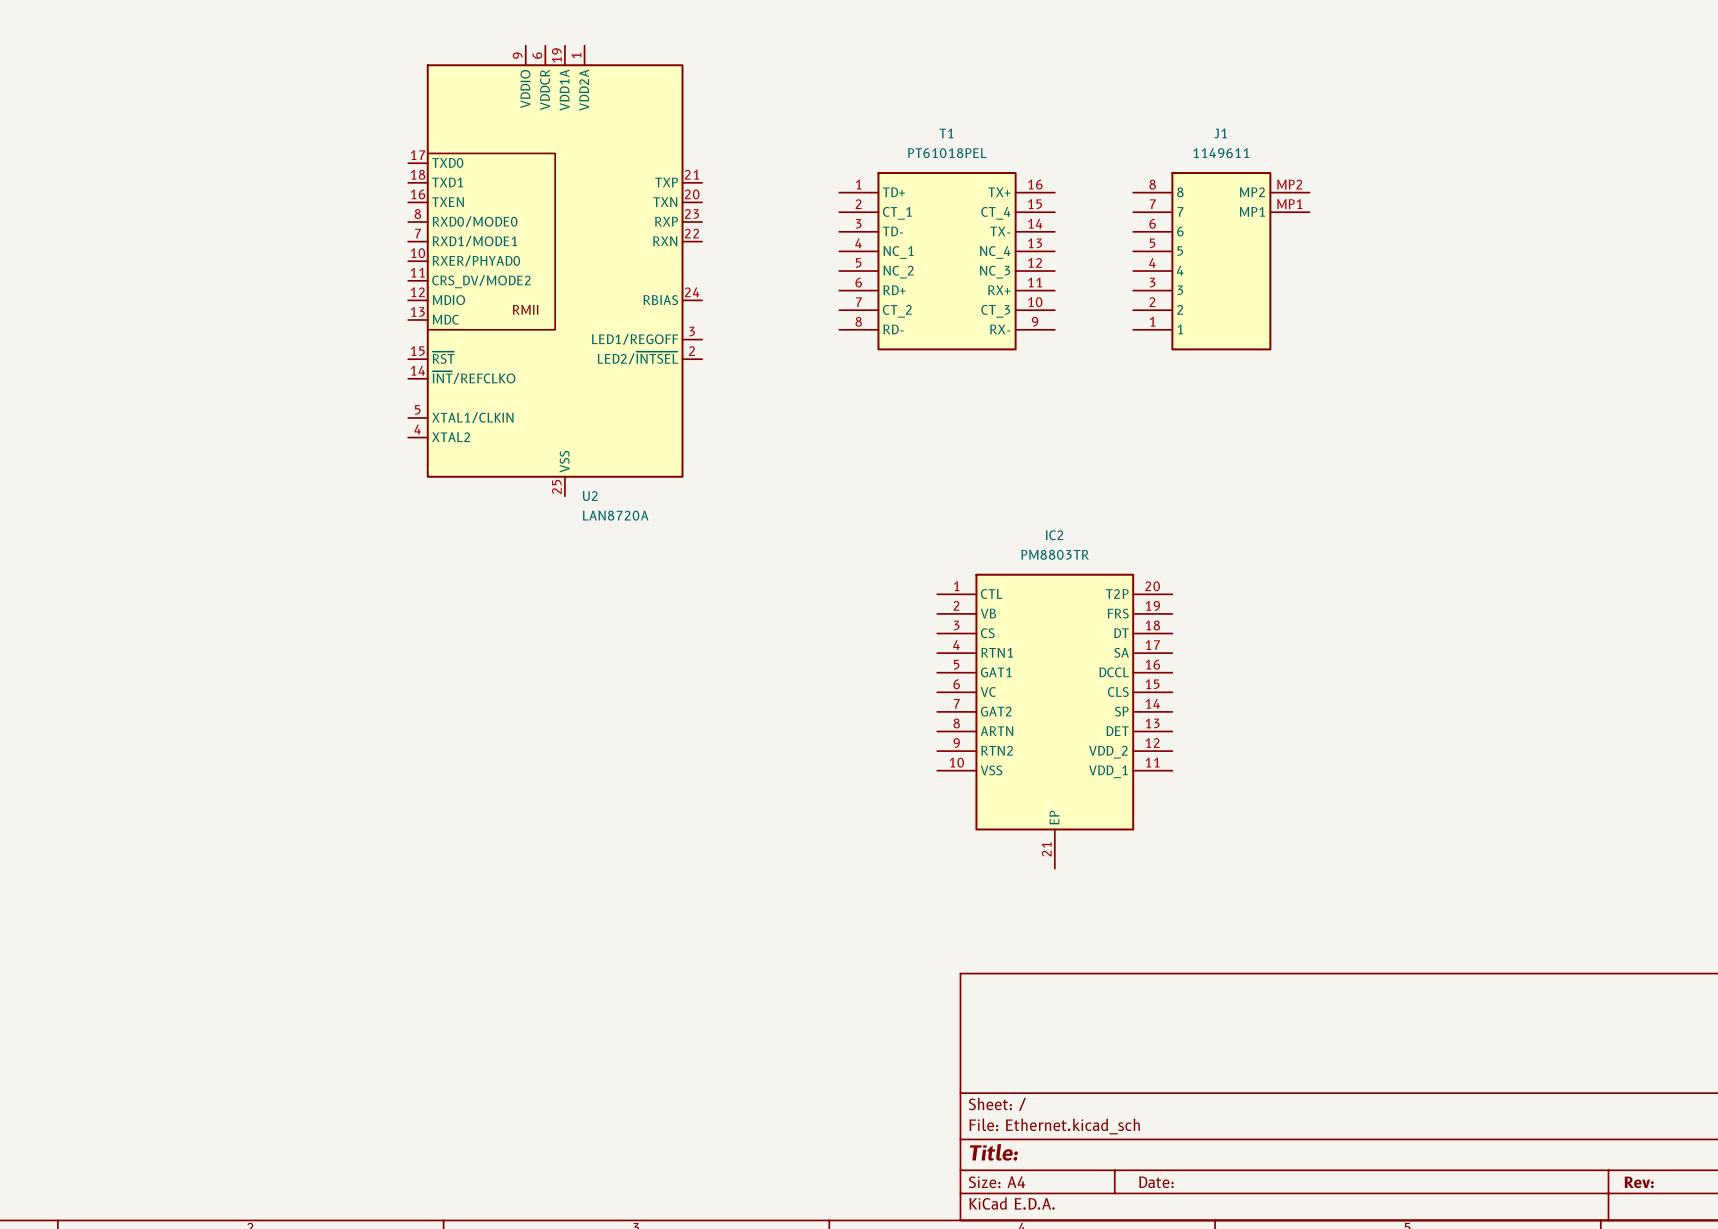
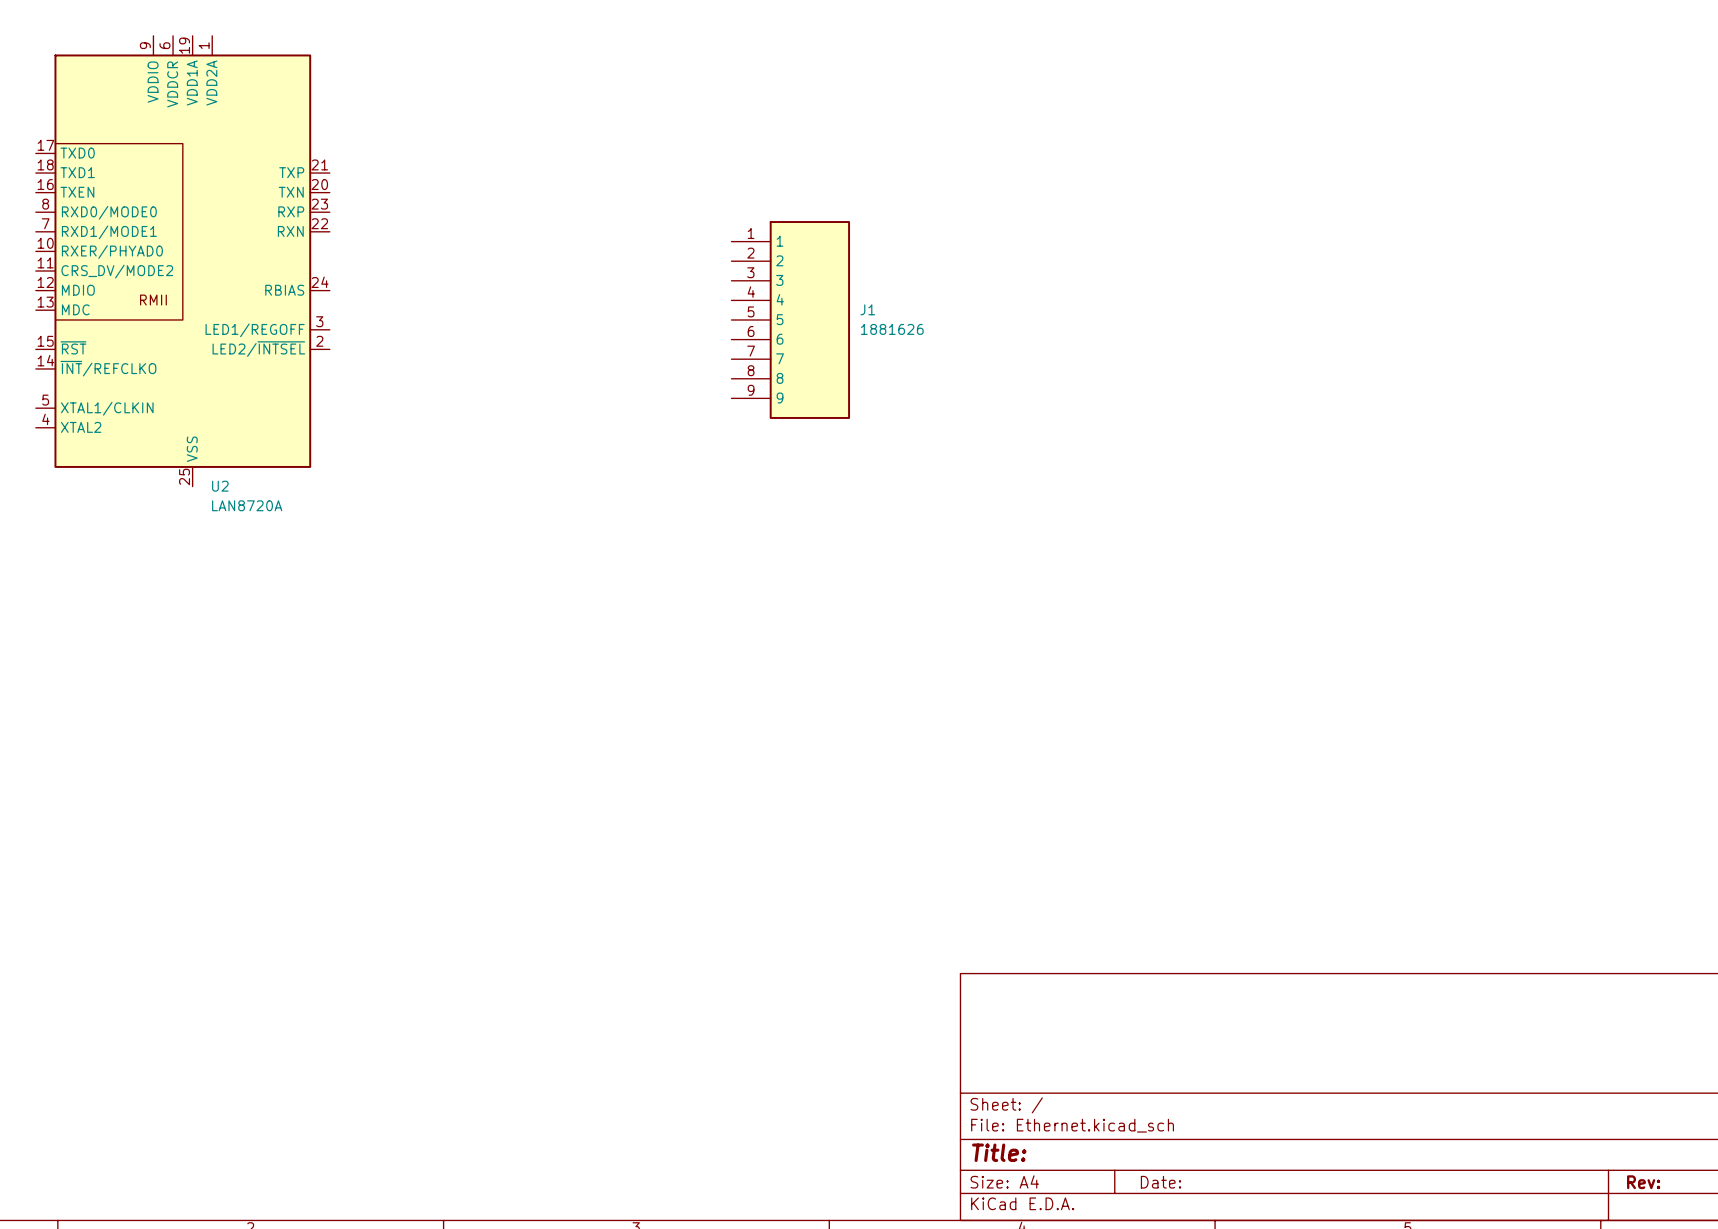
J1 name position: J1 (1220, 133) -> J1 (867, 309)
J1 value: 1149611 (1221, 153) -> 1881626 (892, 329)
J1 symbol: [1133, 172, 1310, 351] -> [731, 221, 851, 419]
T1: PT61018PEL (947, 261) -> none
U2 position: (555, 271) -> (182, 261)
IC2: PM8803TR (1054, 721) -> none

